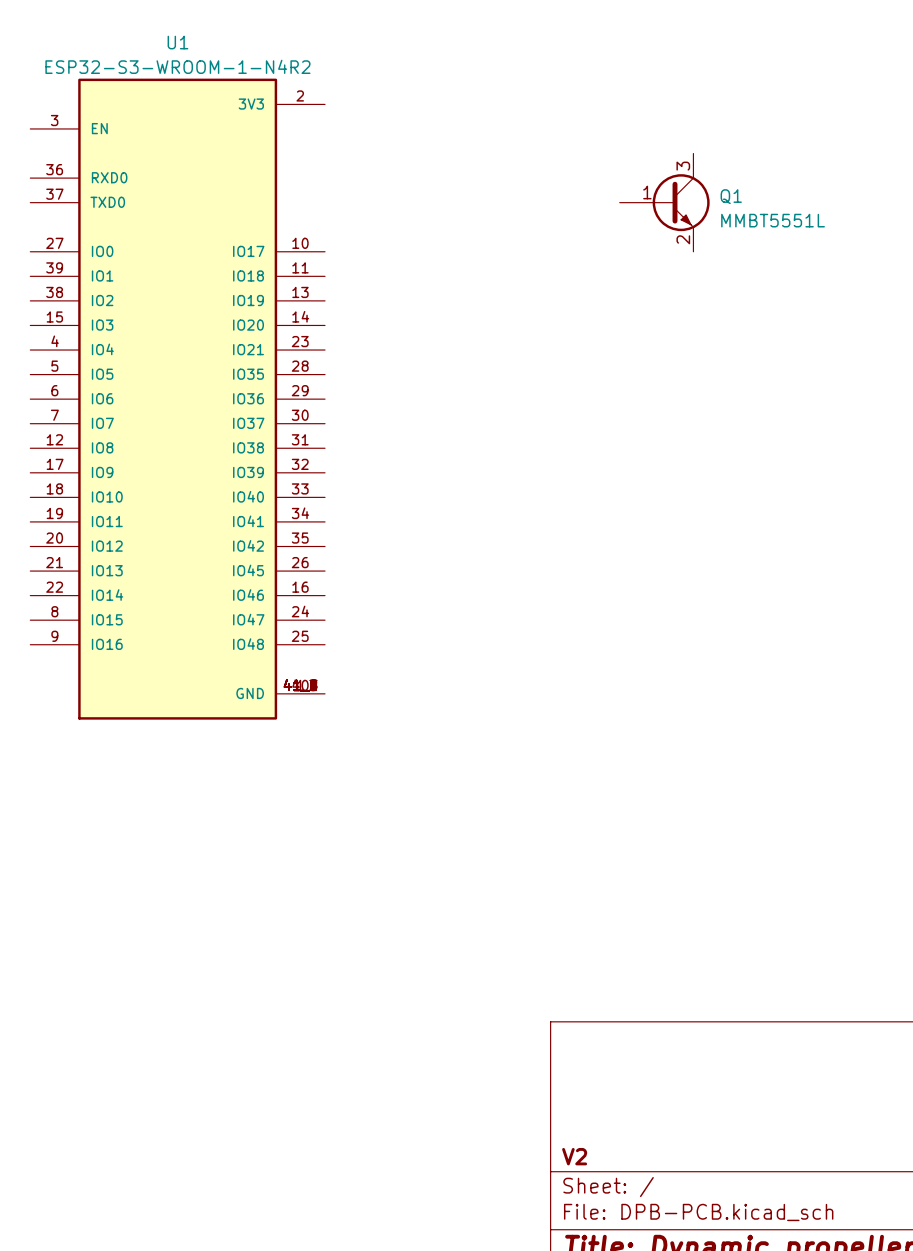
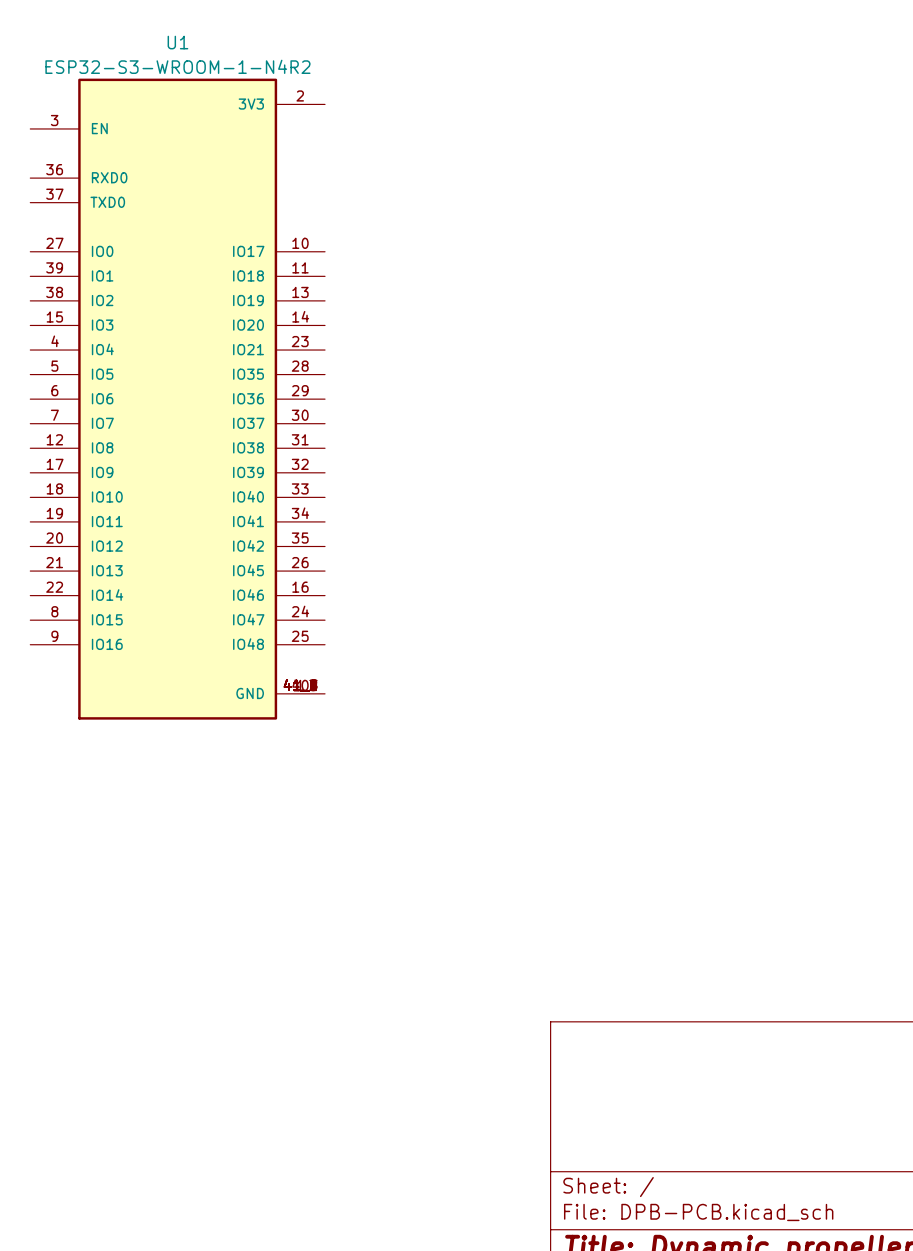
Q1: MMBT5551L (664, 202) -> none
title block: V2 (574, 1156) -> none

